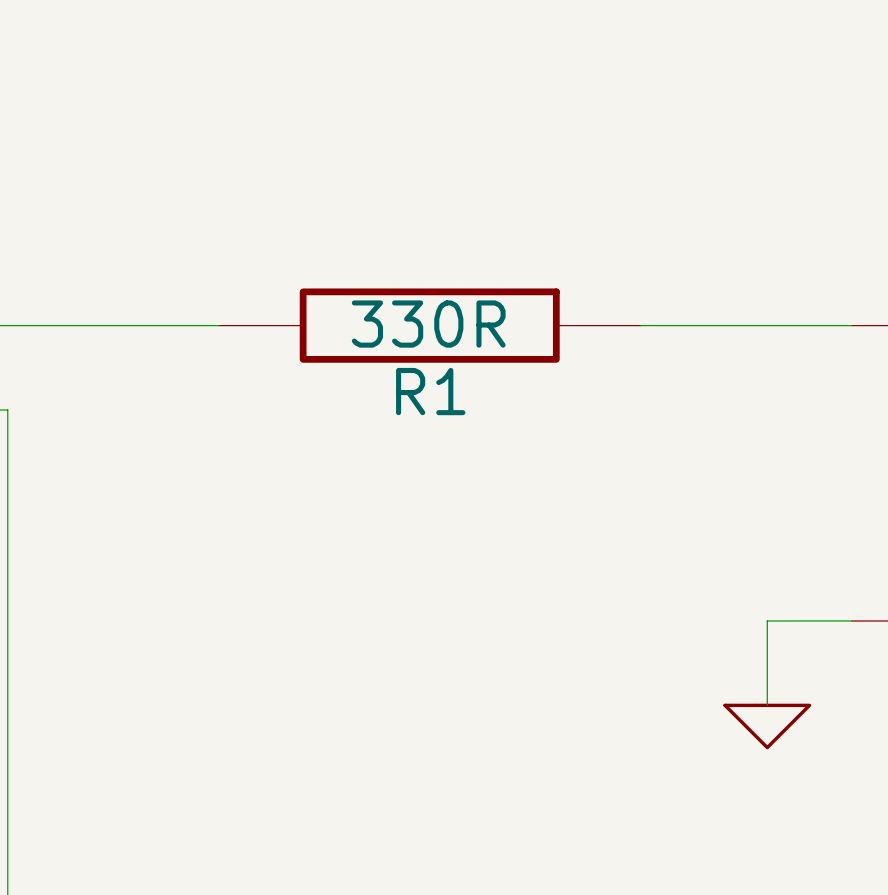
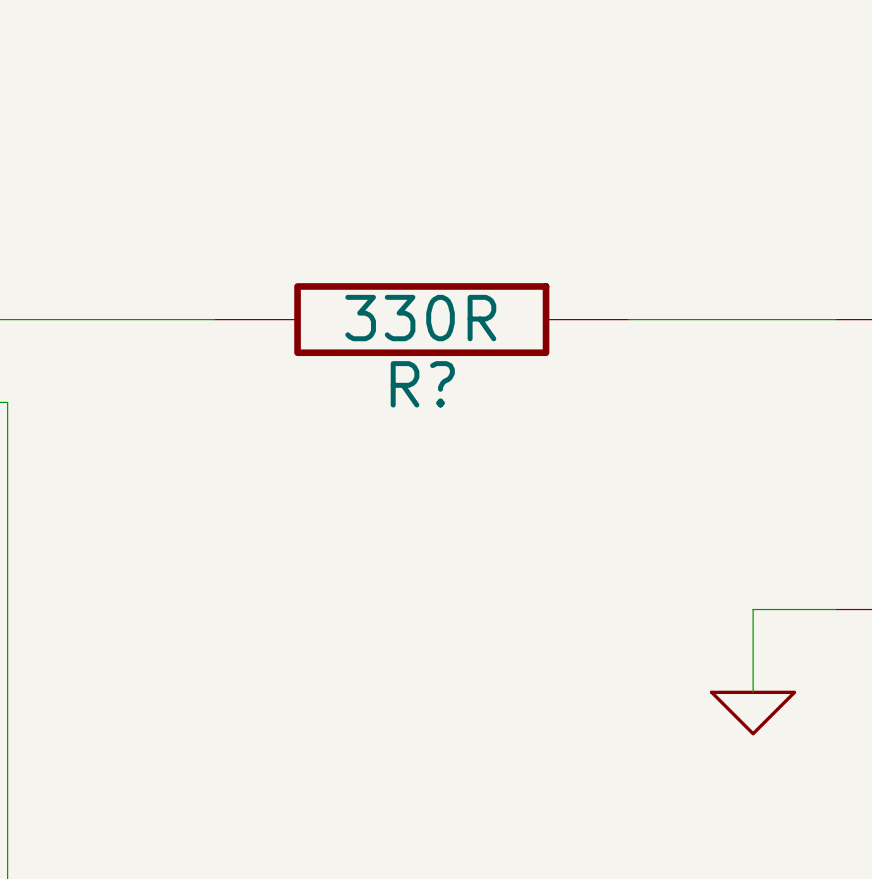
R1 name: R1 (430, 391) -> R? (422, 384)

